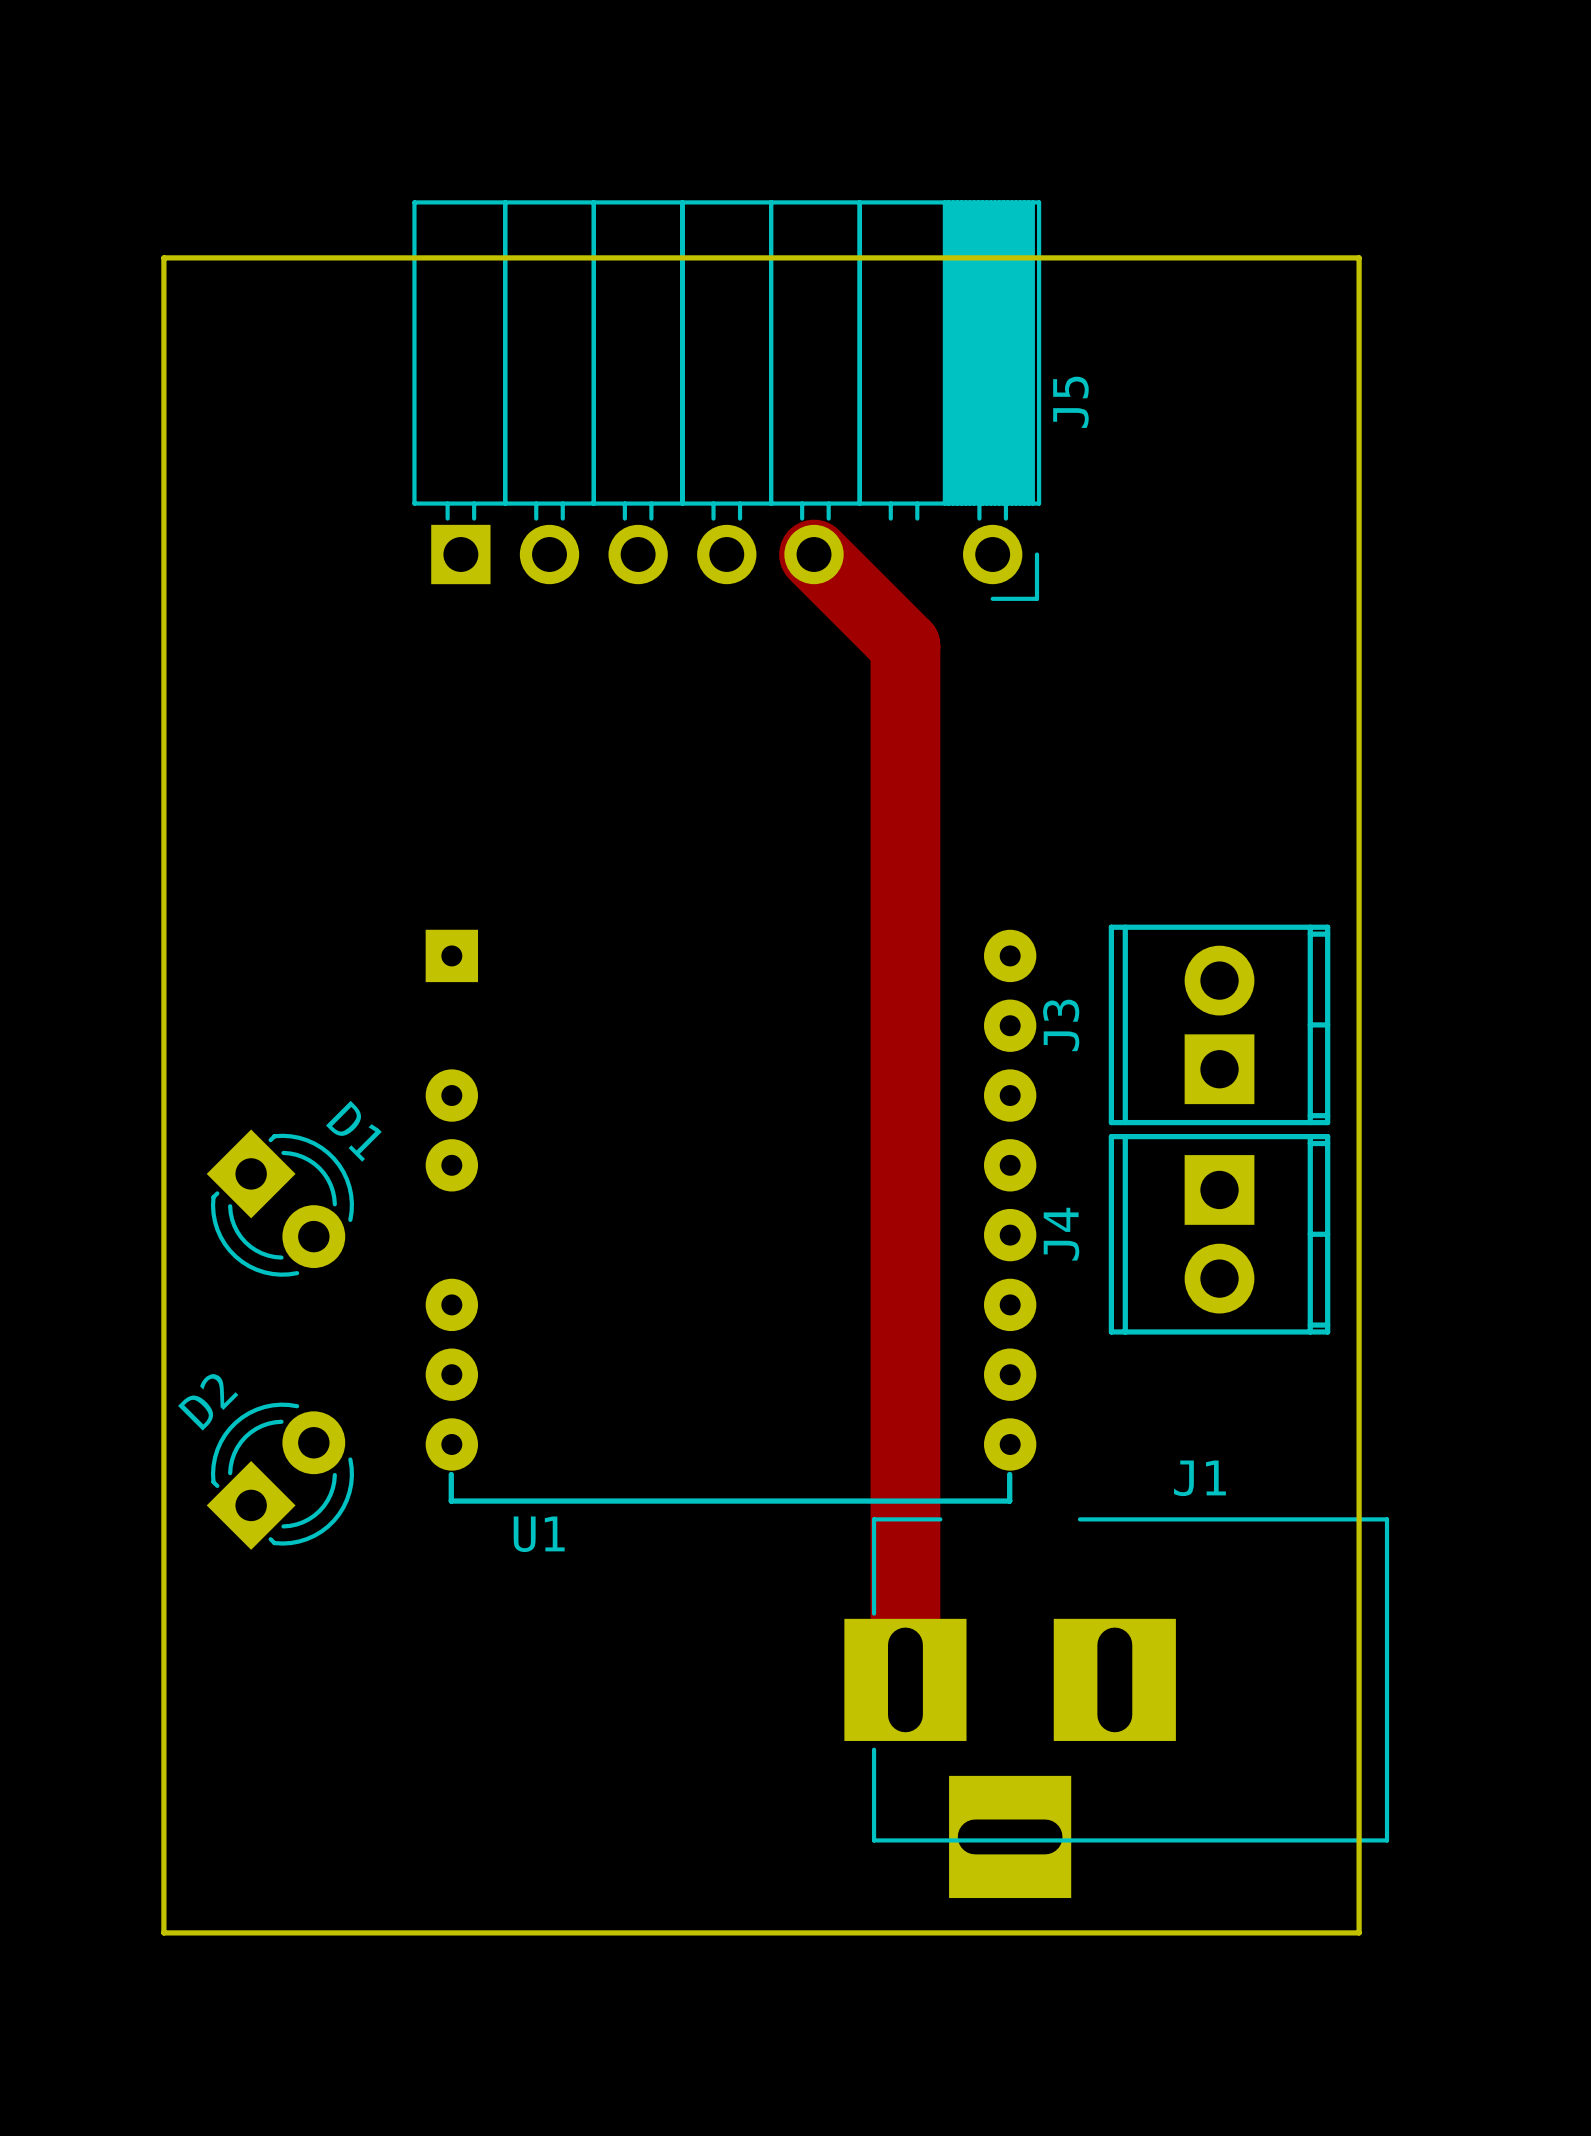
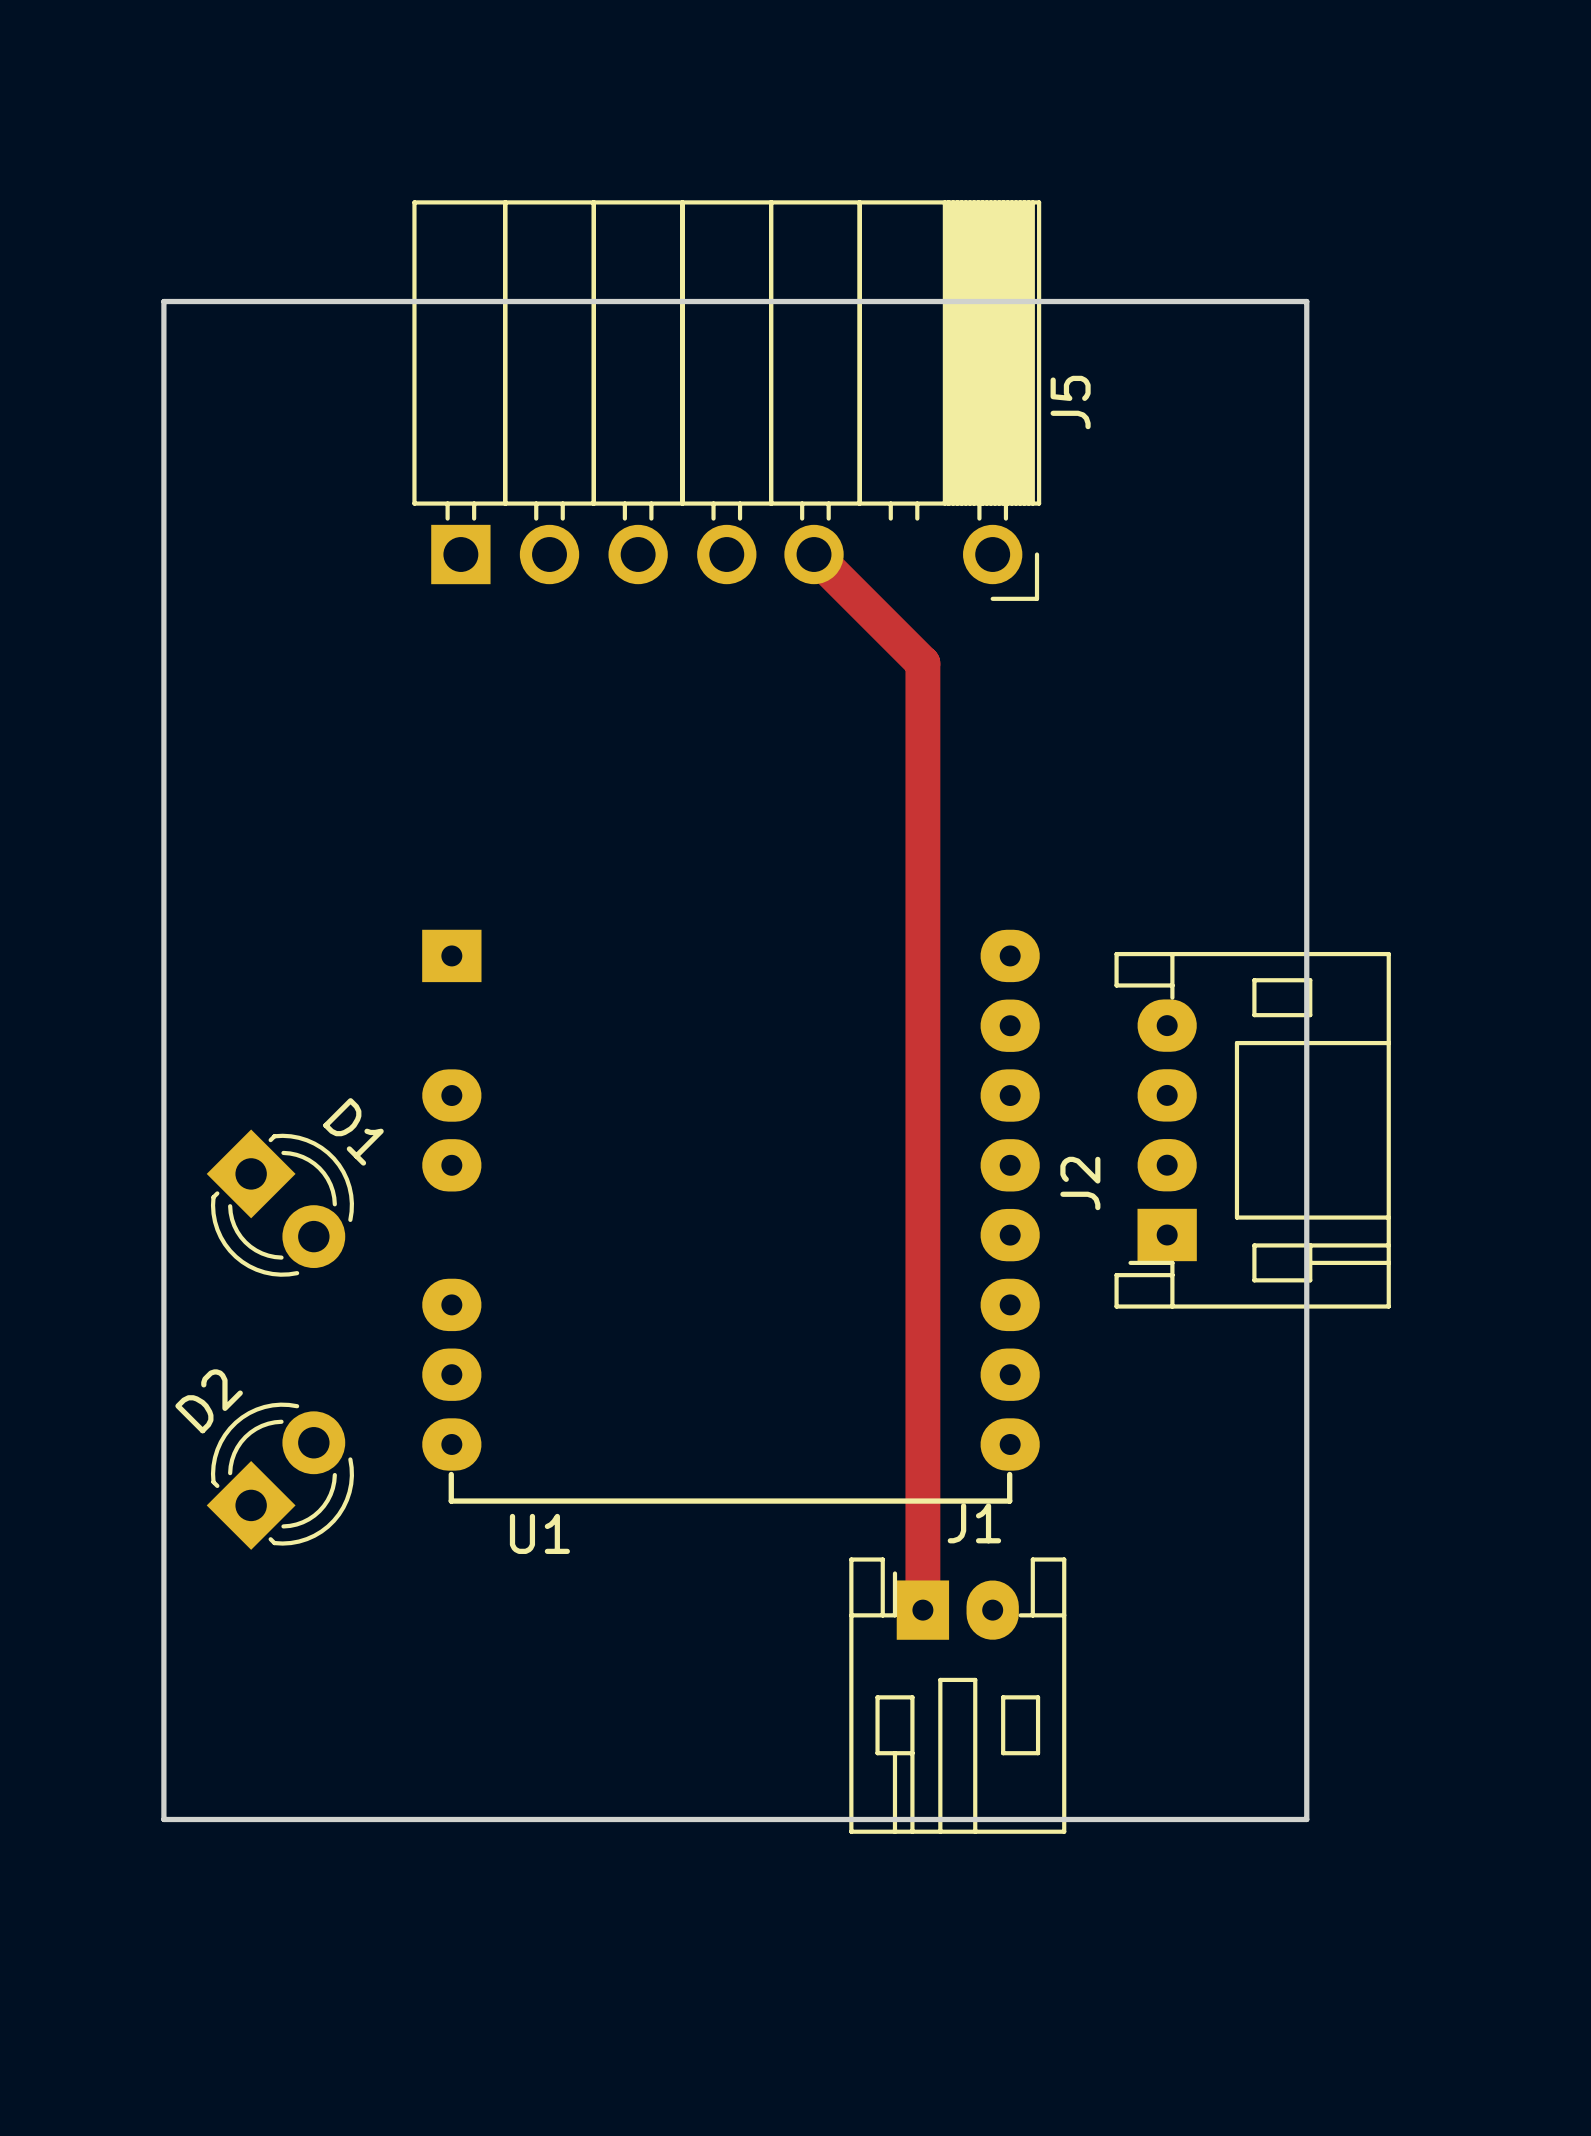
board edge: (163, 301) (163, 257) (1359, 257) (1359, 1932) (163, 1932) (163, 1819) -> (163, 301) (1306, 301) (1306, 1819) (163, 1819)
track width: thick (814, 554) (905, 645) -> thin (814, 554) (905, 645)
track: (905, 645) (905, 1679) -> (905, 645) (922, 663) (922, 1610)
U1 footprint: [425, 929, 1037, 1504] -> [422, 929, 1040, 1504]
J3: (1219, 1024) -> none
J2: none -> (1252, 1130)
J4: (1219, 1234) -> none
J1 name position: J1 (1199, 1478) -> J1 (974, 1523)
J1 footprint: [844, 1517, 1390, 1899] -> [849, 1557, 1067, 1834]

